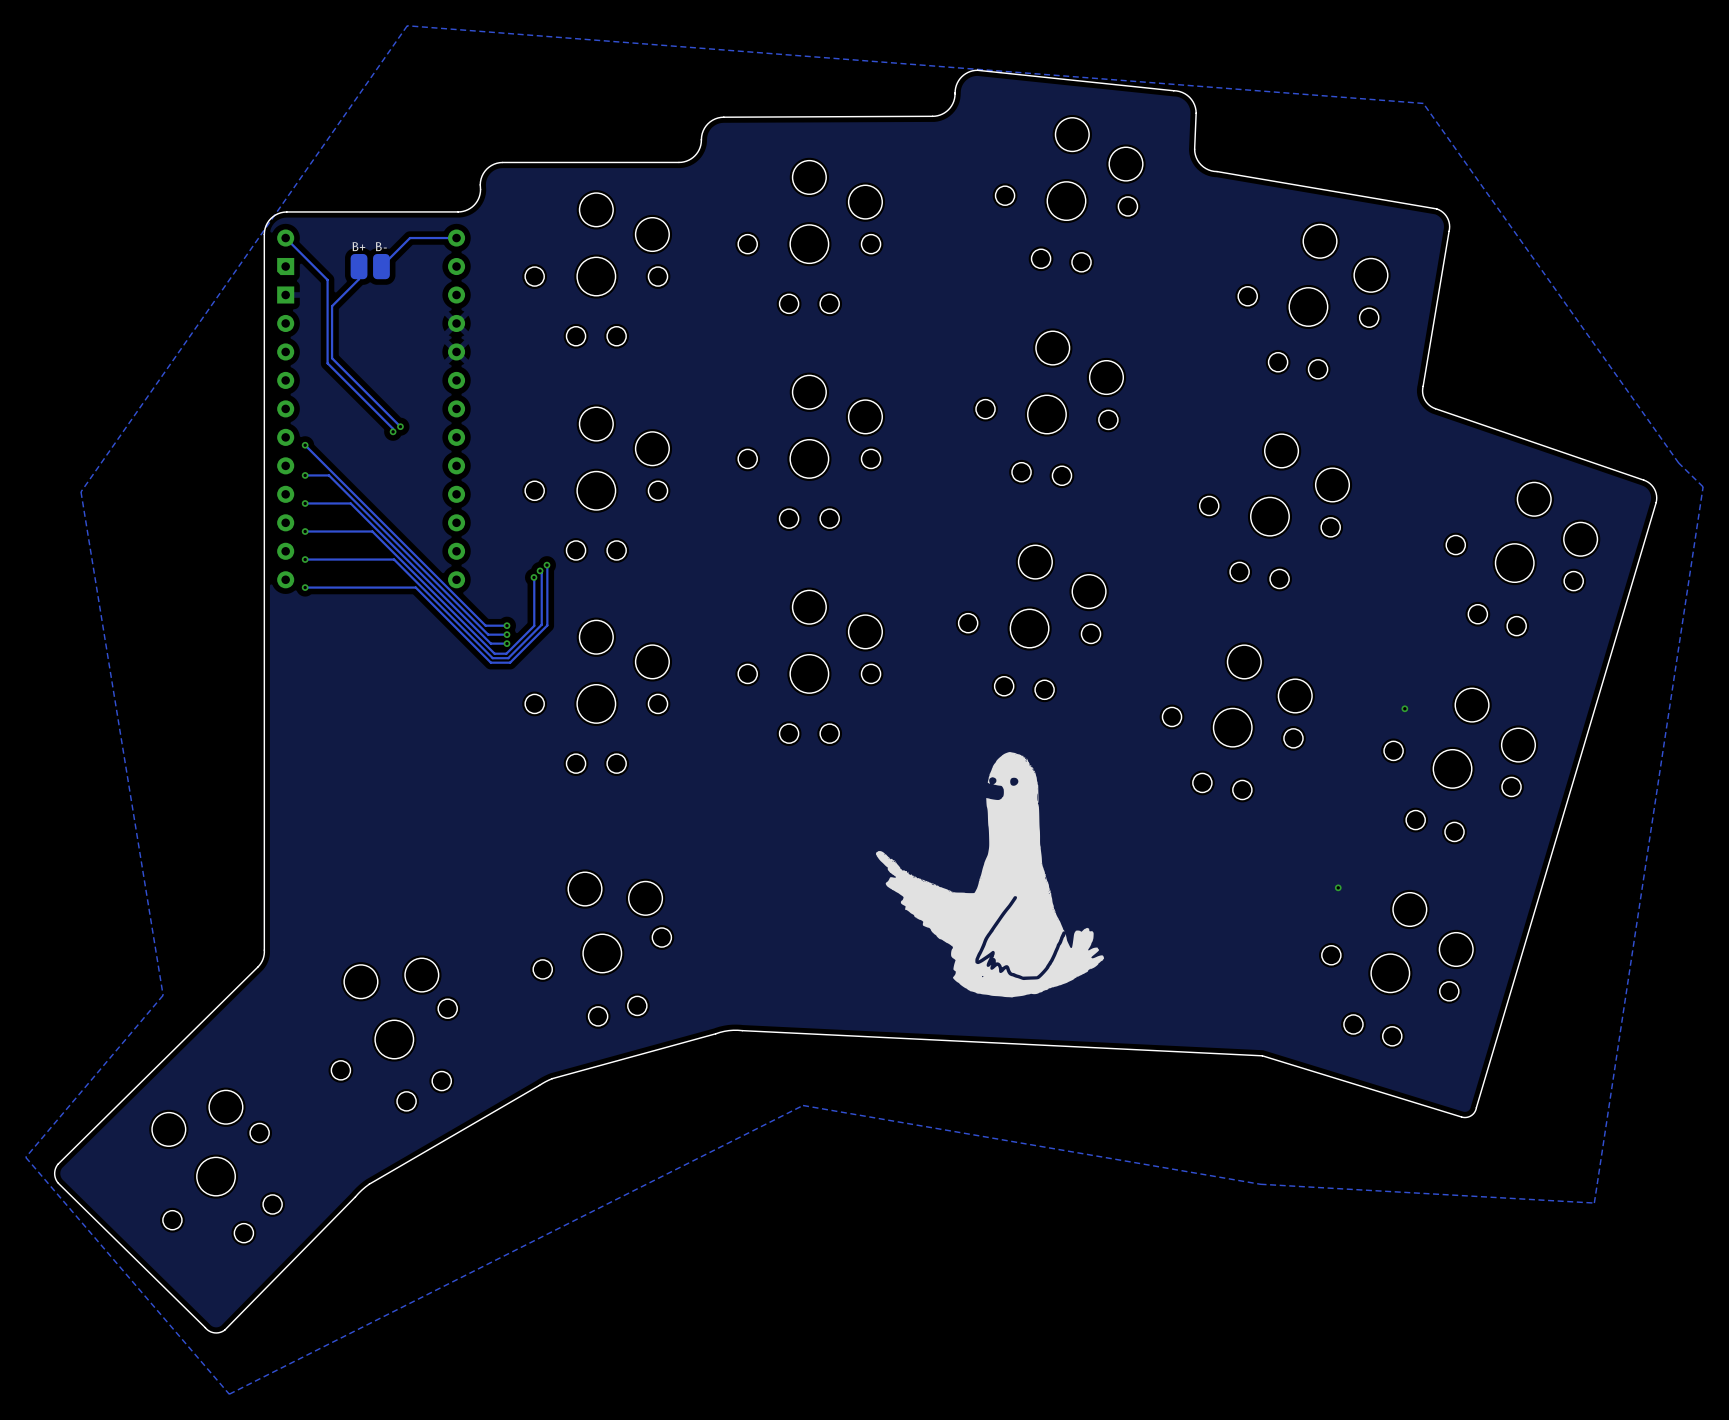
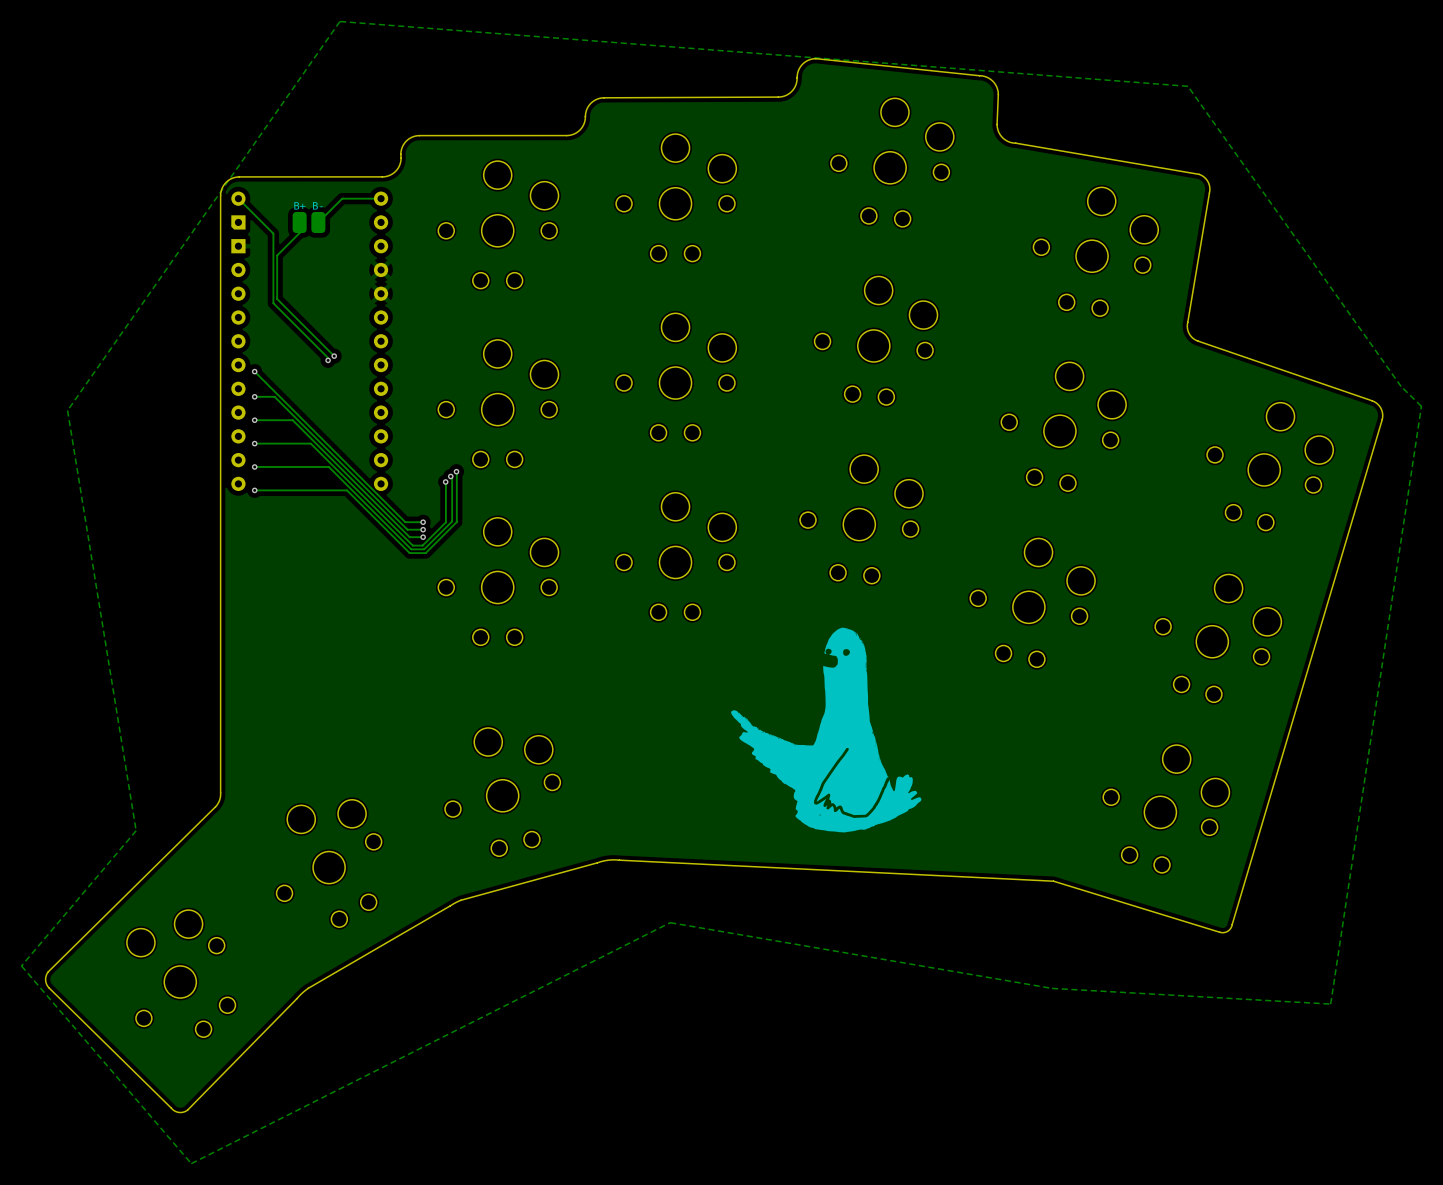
via: (1404, 708) -> none
via: (1338, 887) -> none

